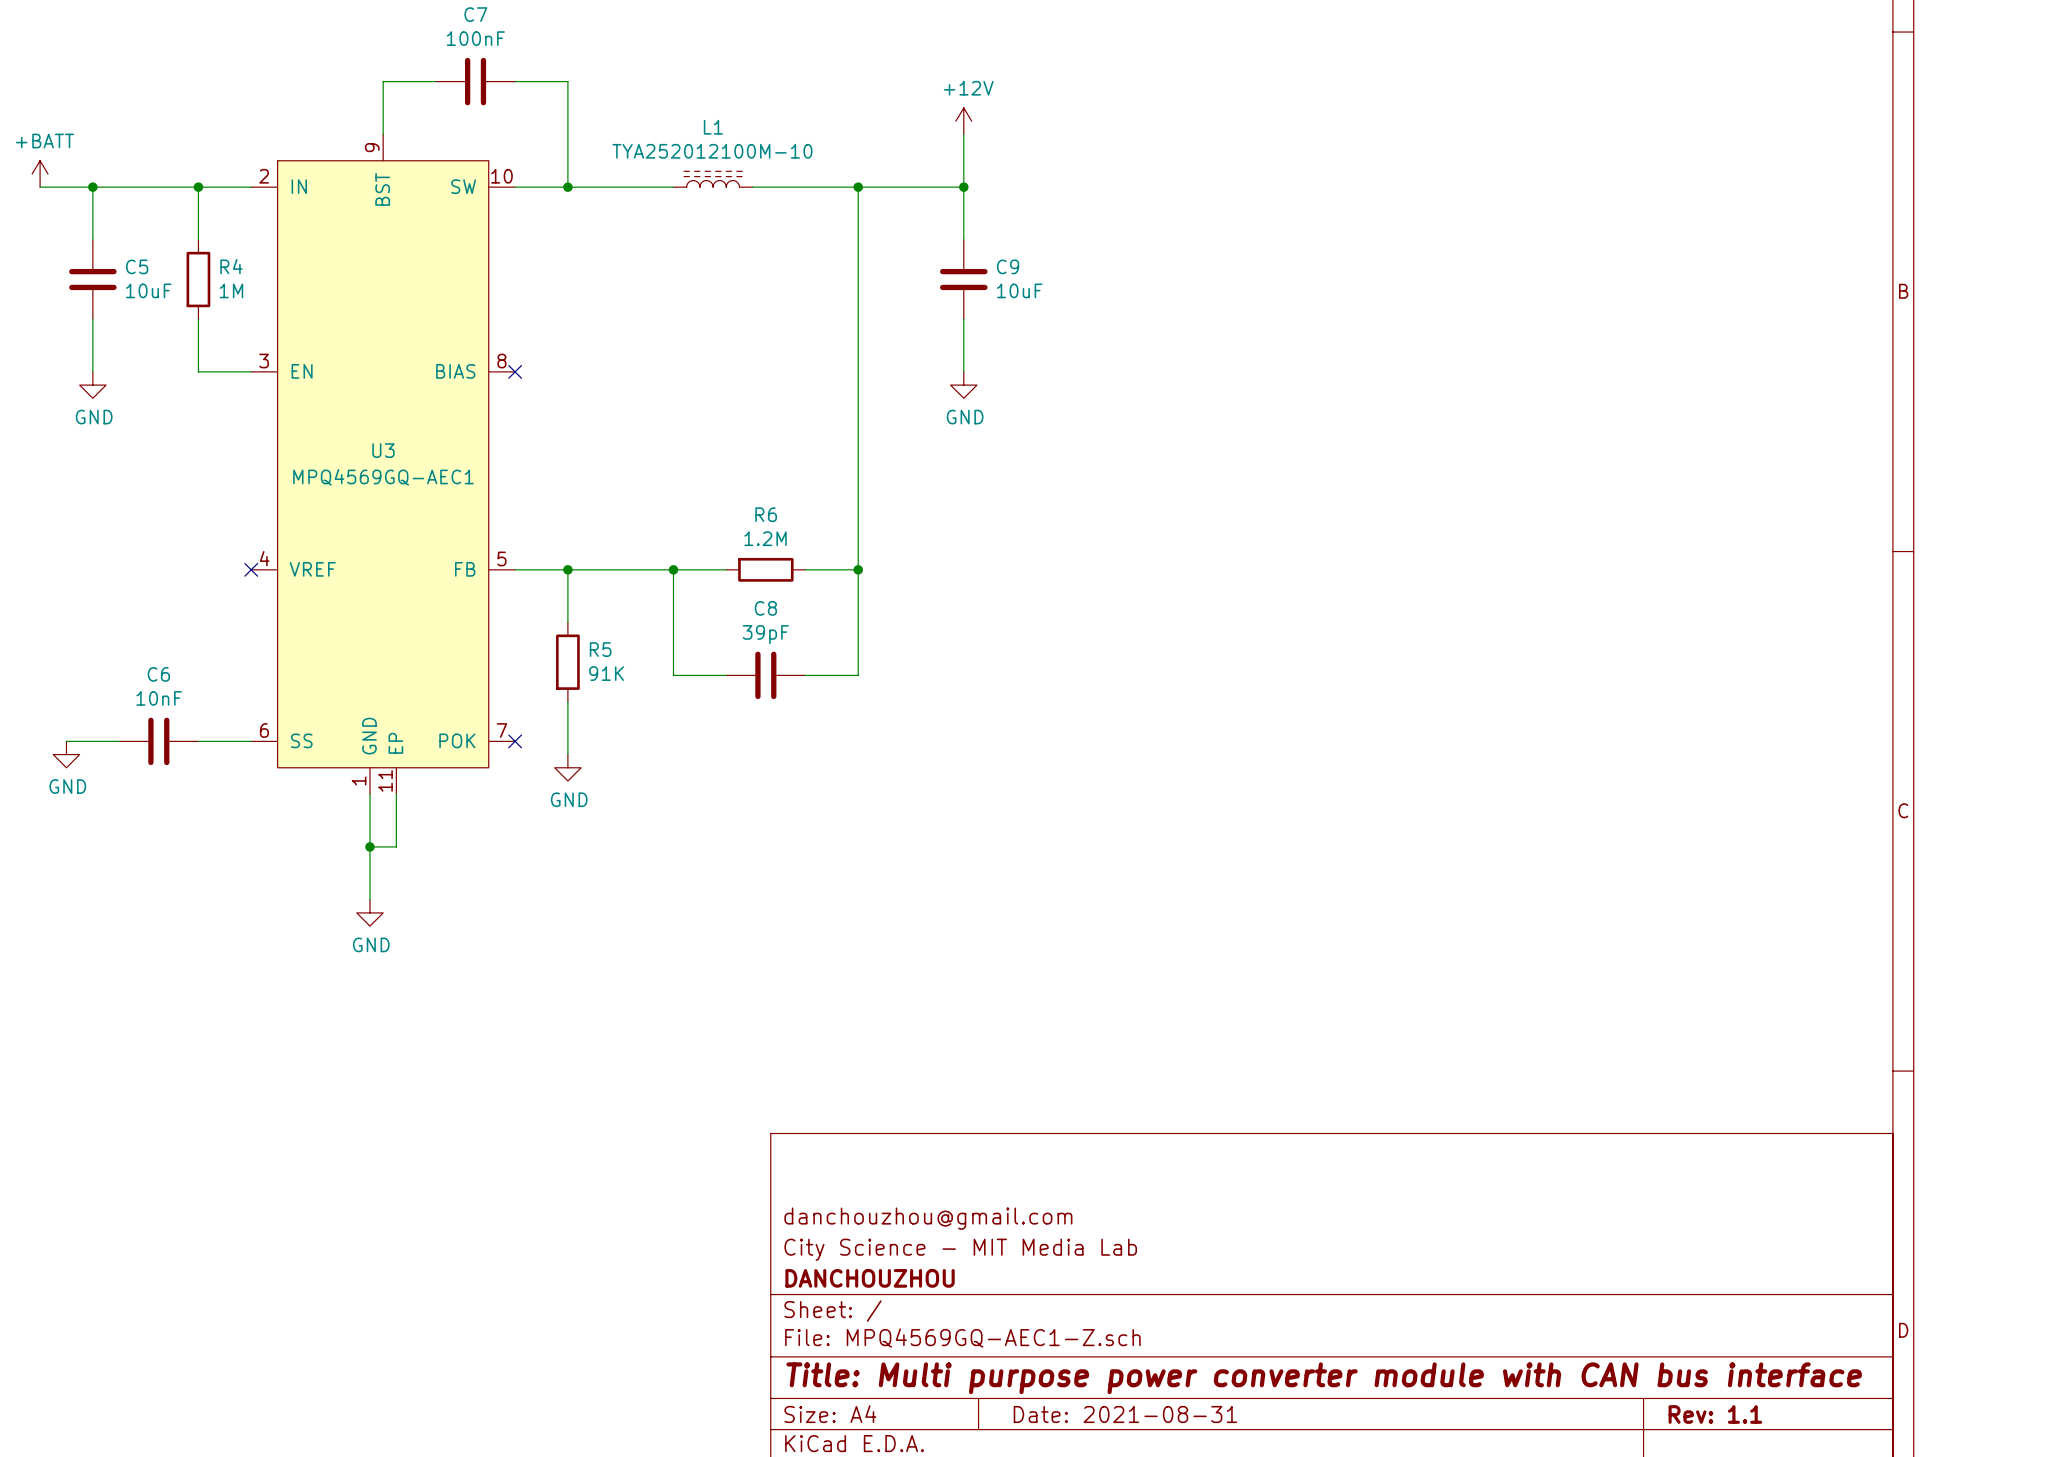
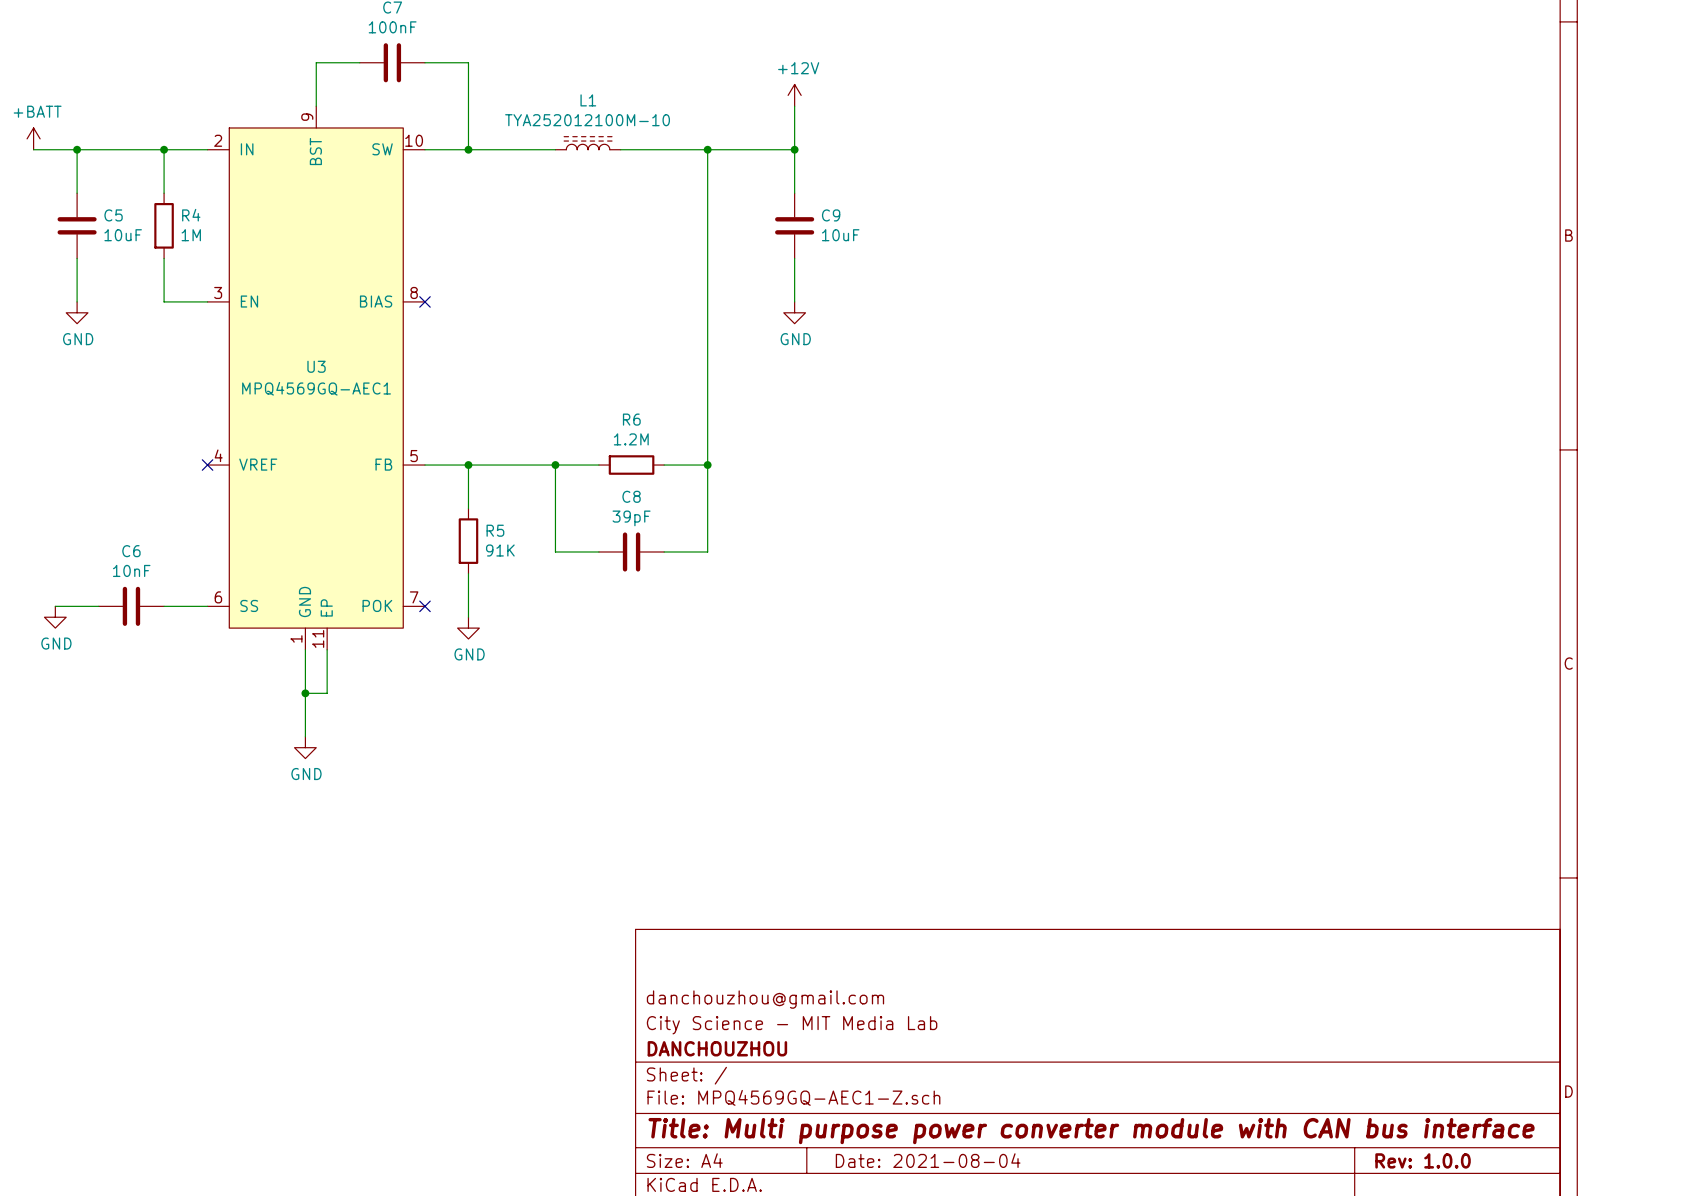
title block: Date: 2021-08-31 (1125, 1414) -> Date: 2021-08-04 (928, 1160)
title block: Rev: 1.1 (1715, 1414) -> Rev: 1.0.0 (1423, 1160)

